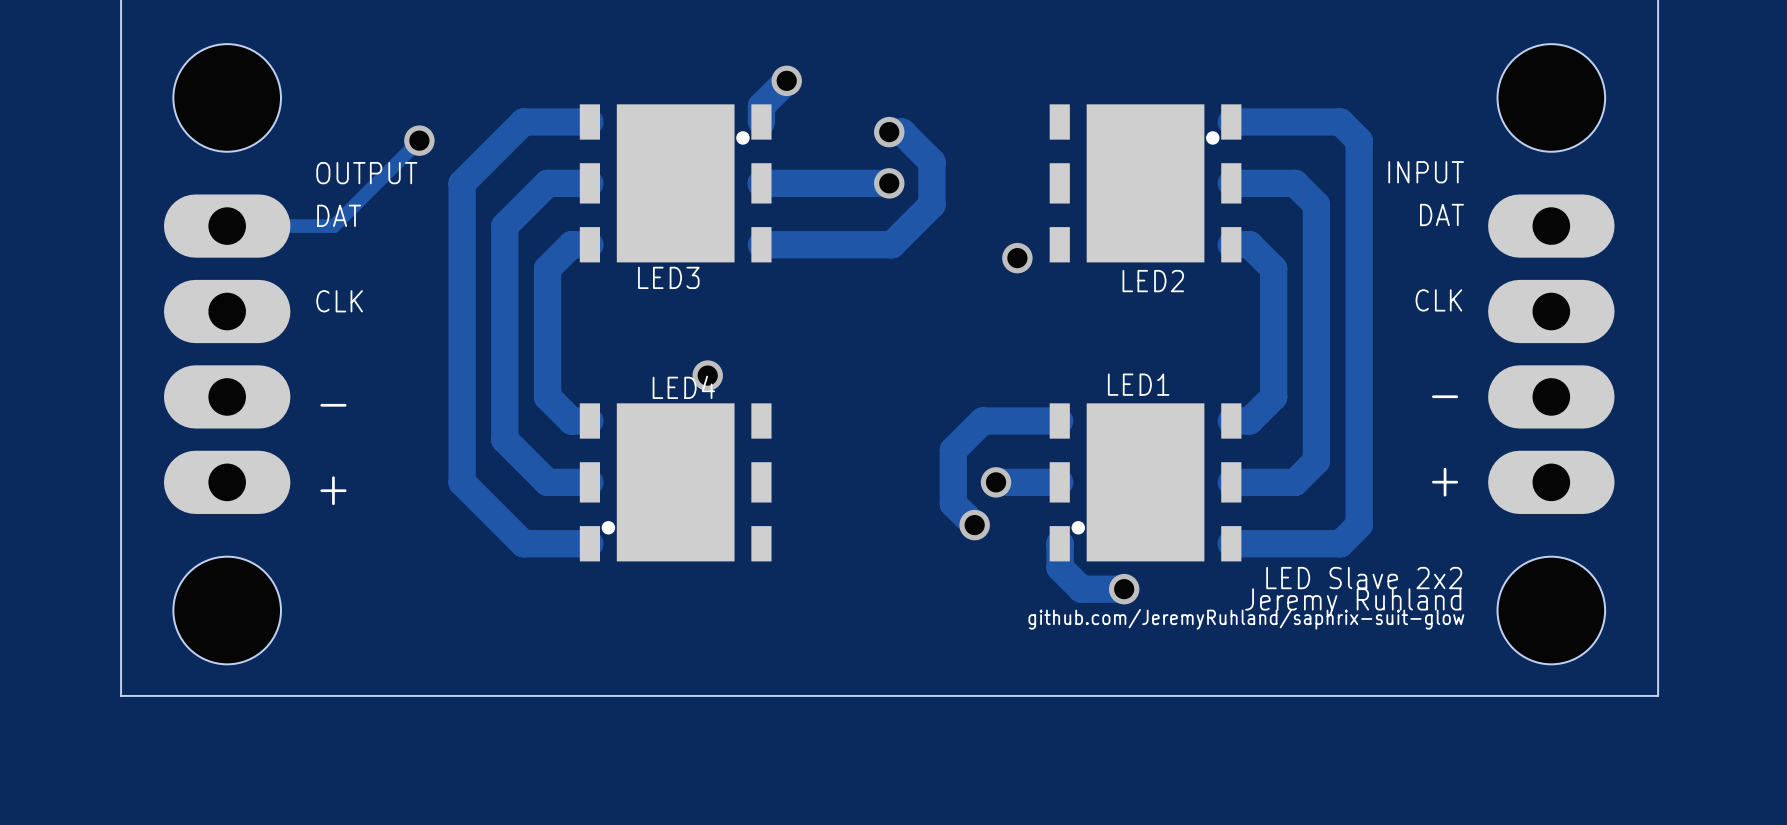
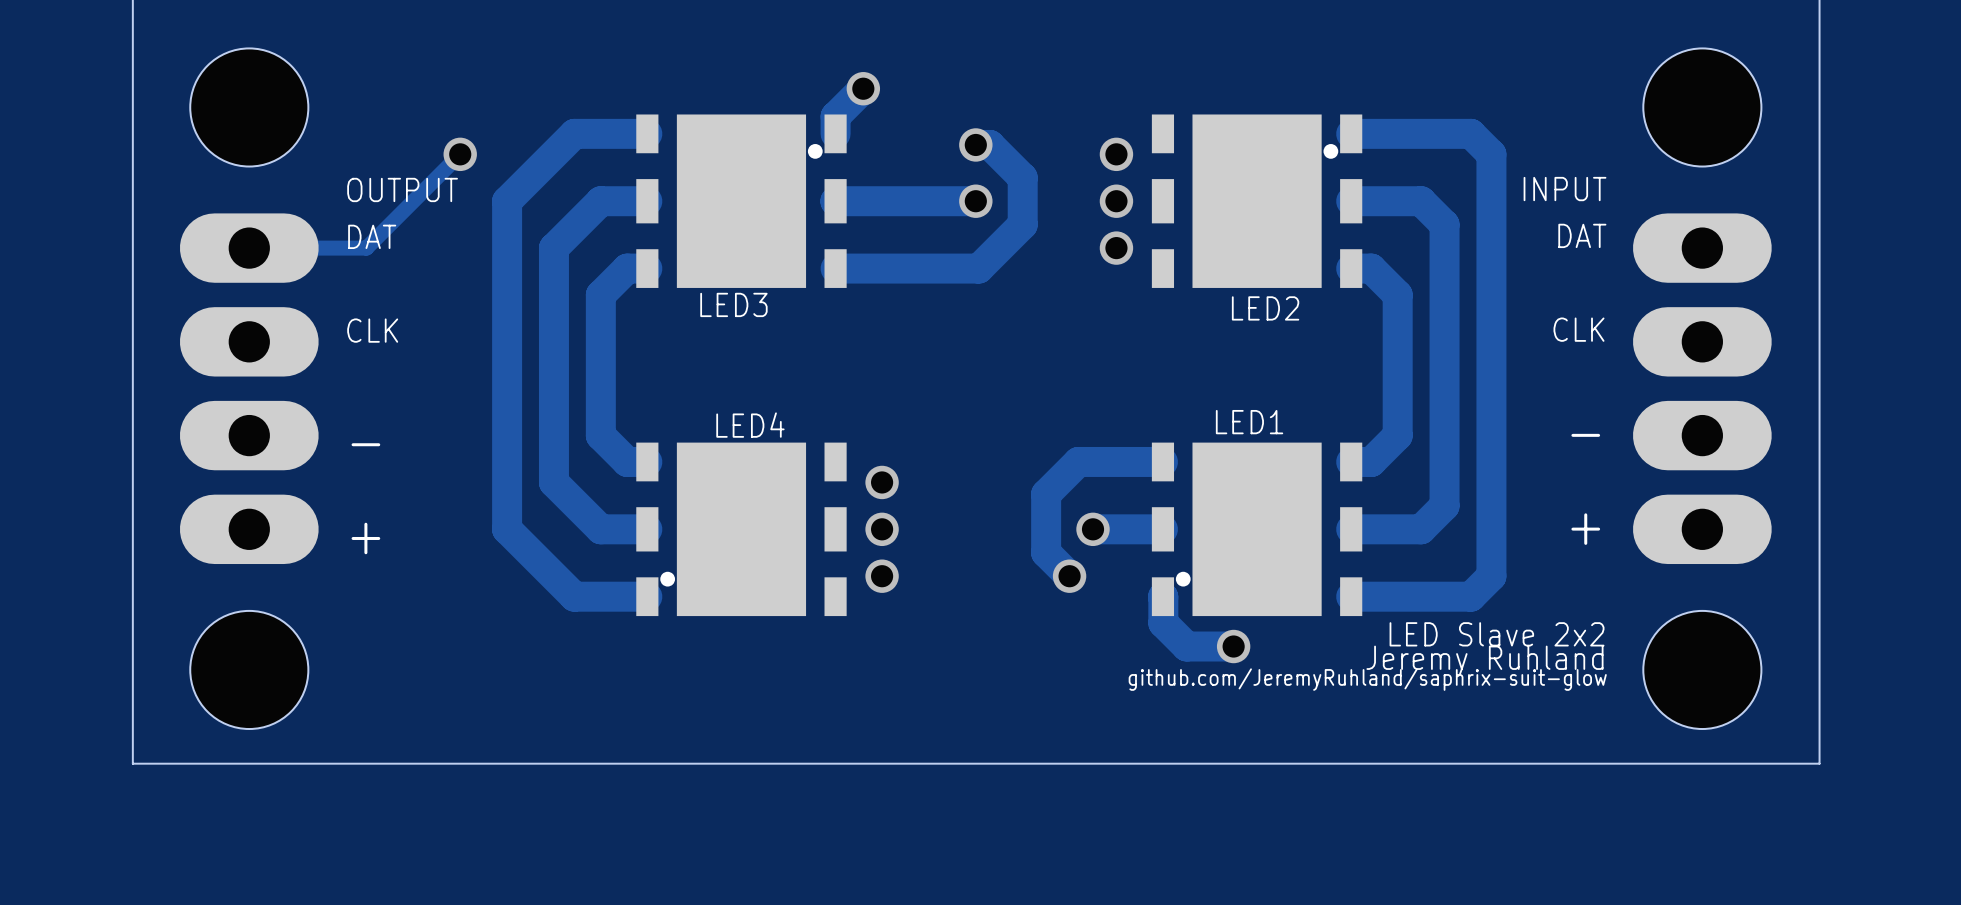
via: none -> (1116, 154)
via: none -> (1116, 201)
via position: (1017, 258) -> (1116, 248)
via: (707, 375) -> none
via: none -> (882, 482)
via: none -> (882, 529)
via: none -> (882, 576)

